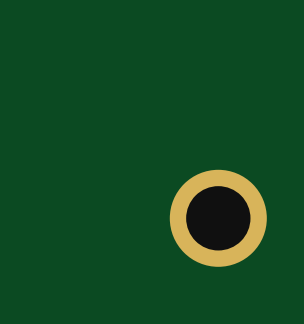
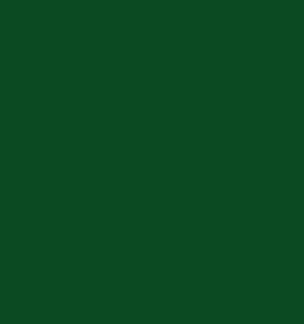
part: (218, 218) -> none

